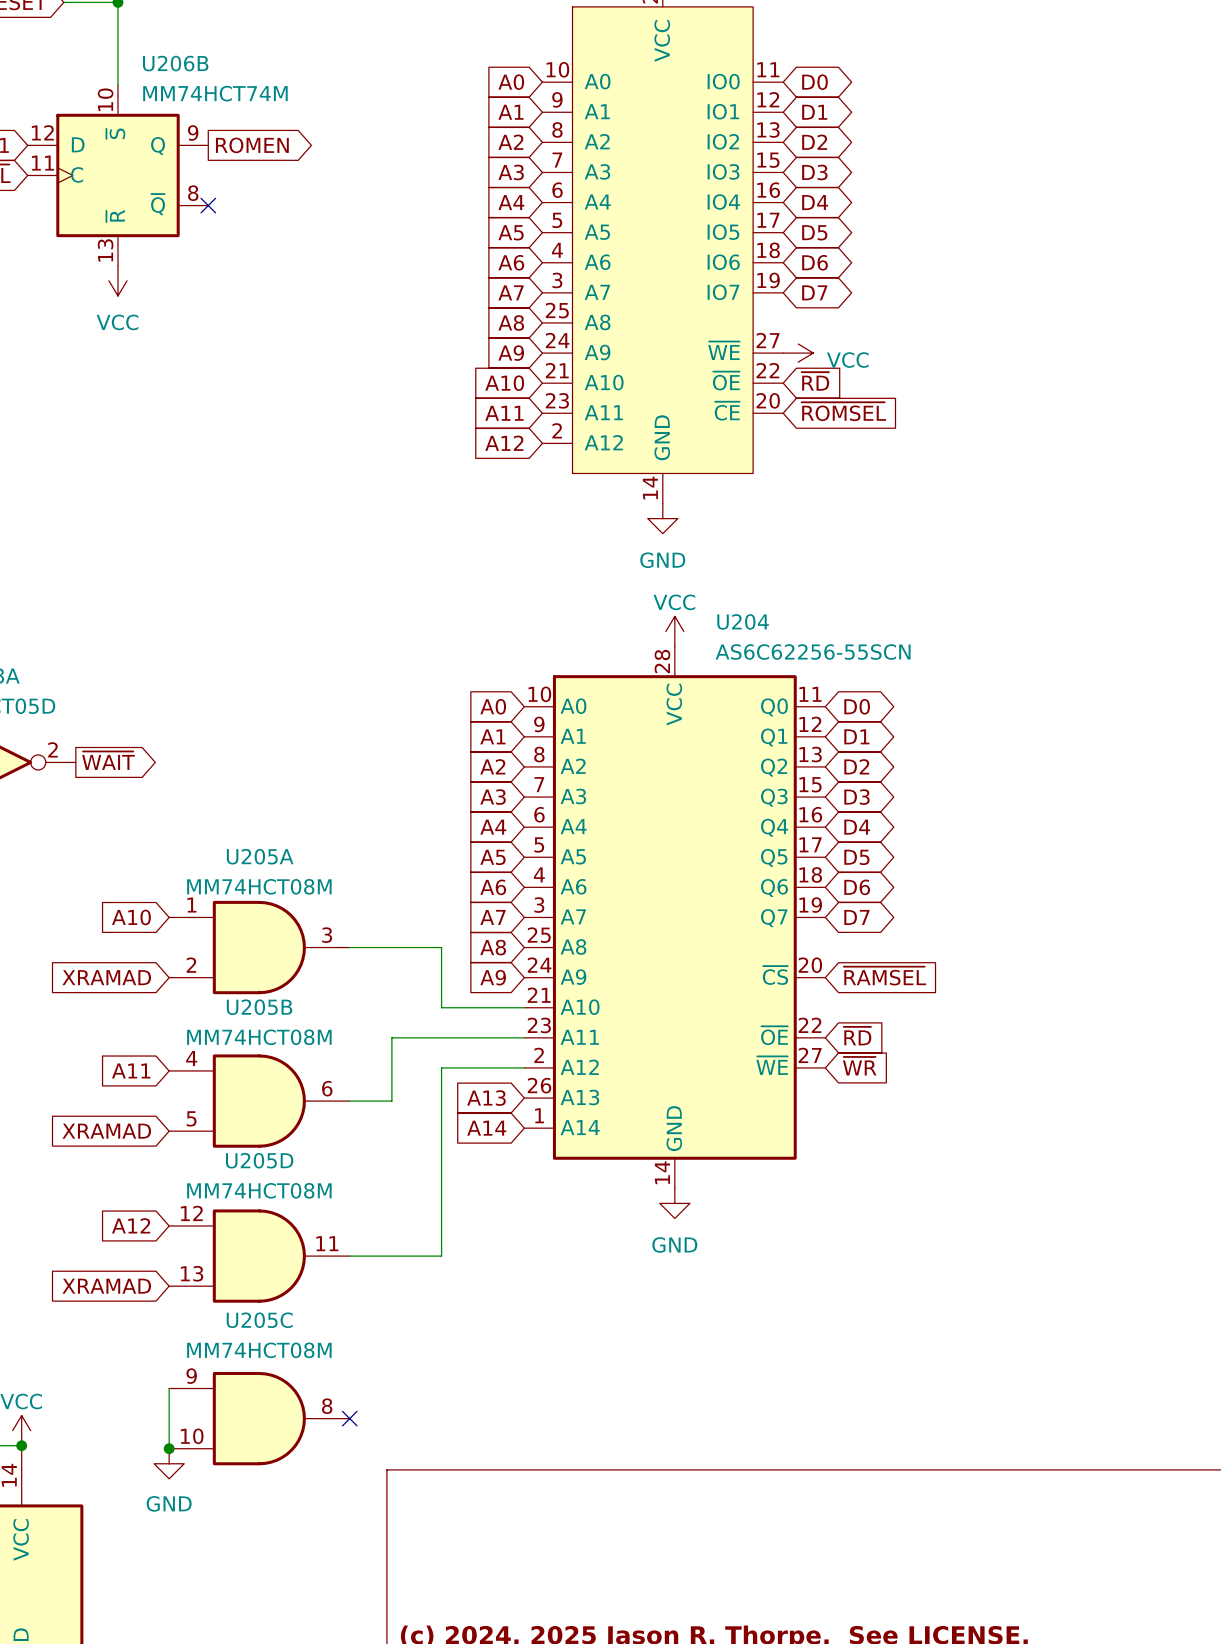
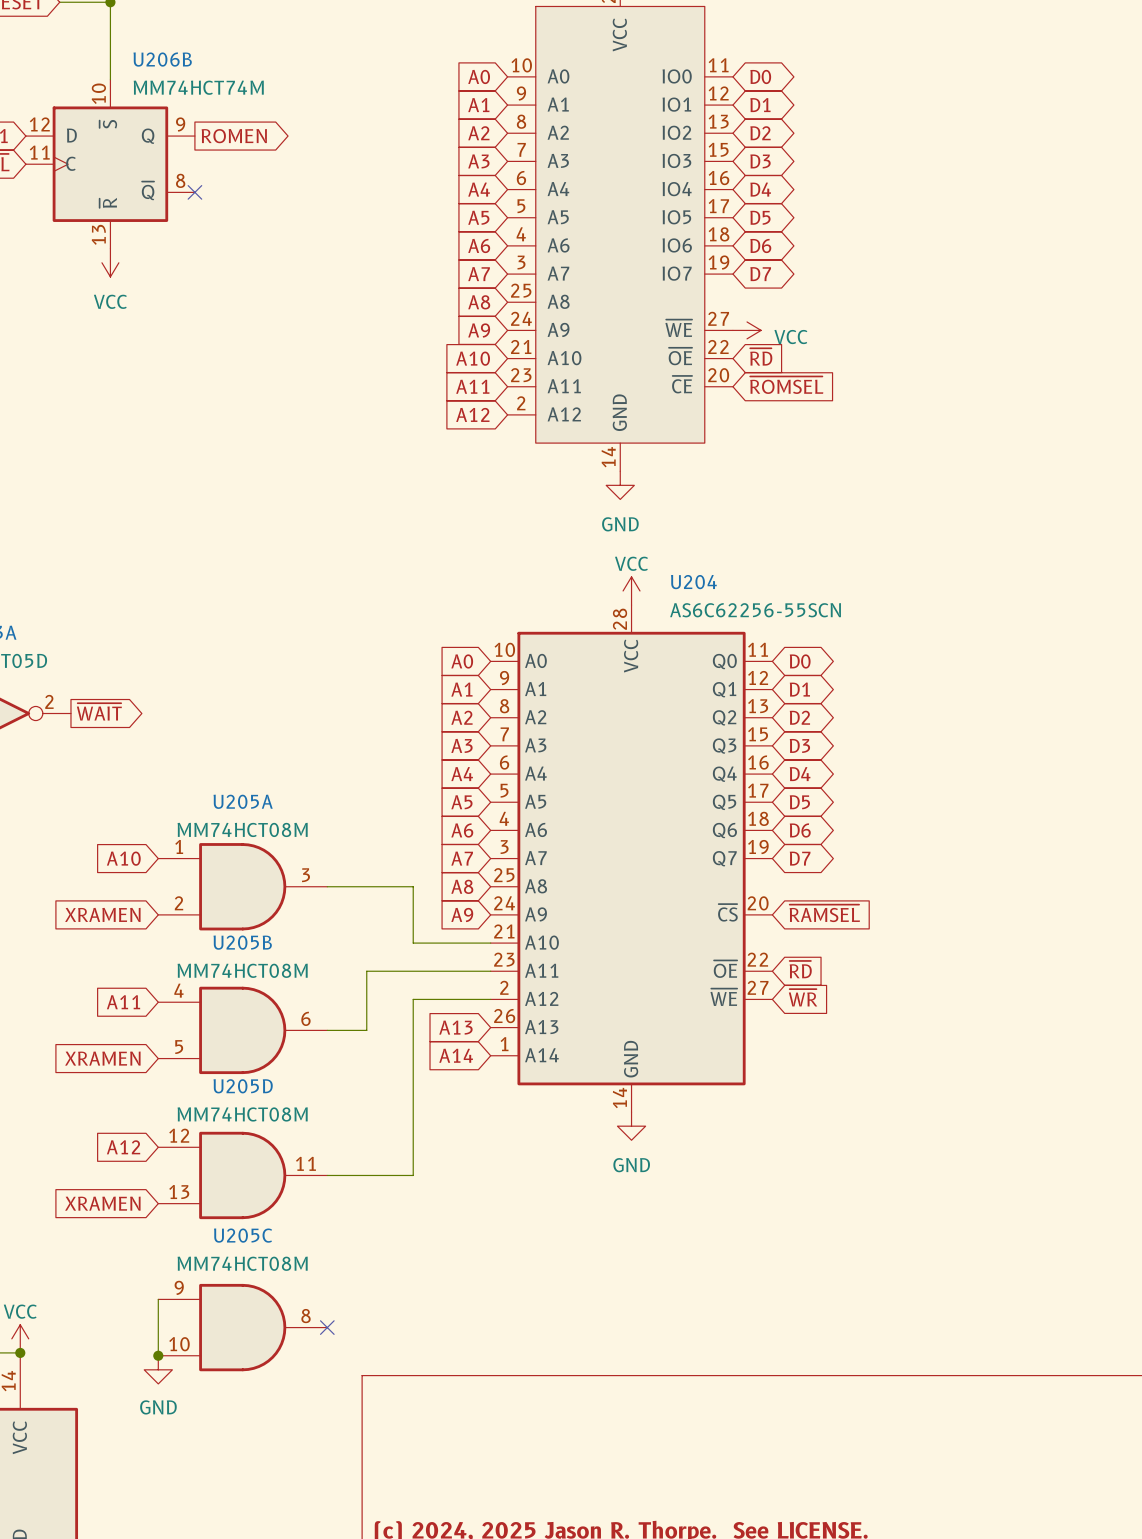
global label: XRAMAD (106, 977) -> XRAMEN (102, 914)
global label: XRAMAD (106, 1131) -> XRAMEN (102, 1058)
global label: XRAMAD (106, 1286) -> XRAMEN (102, 1203)

